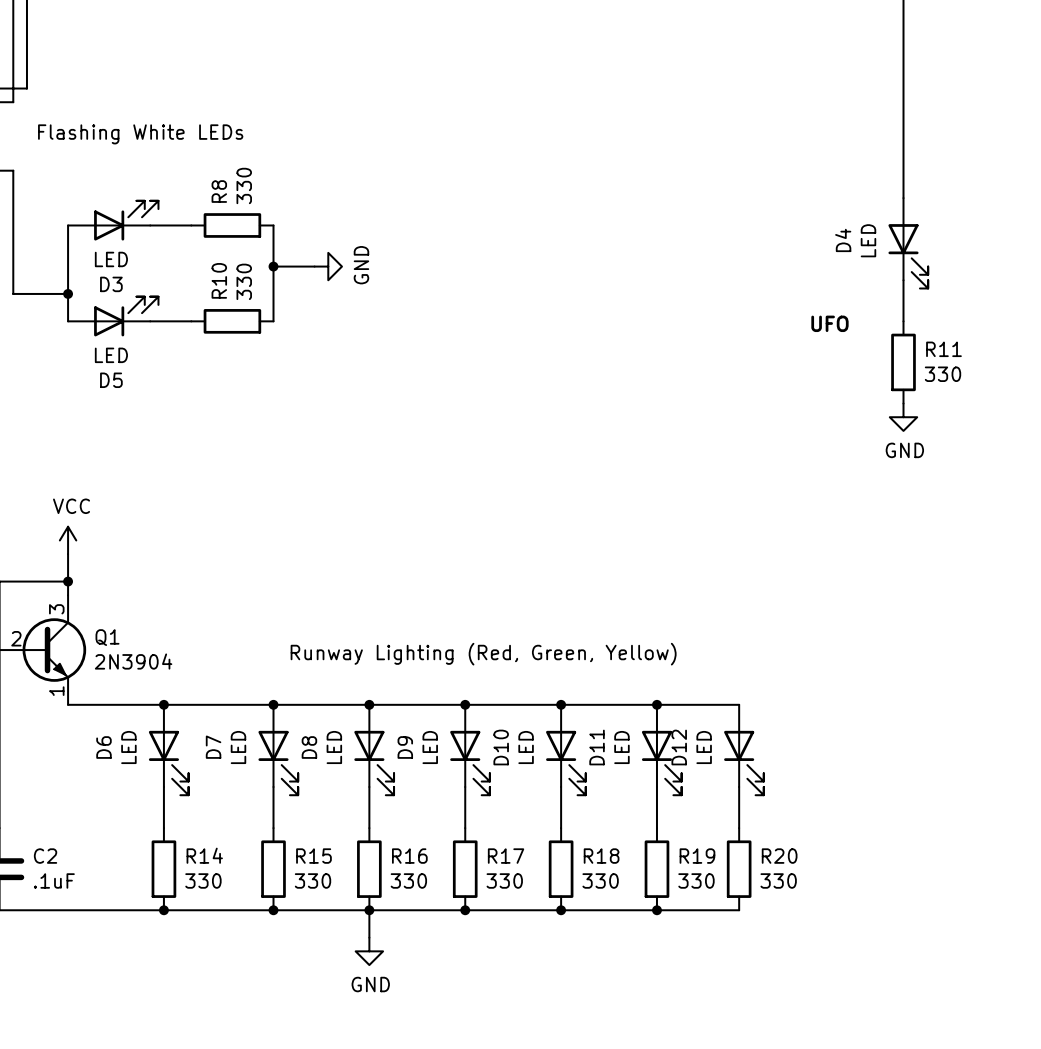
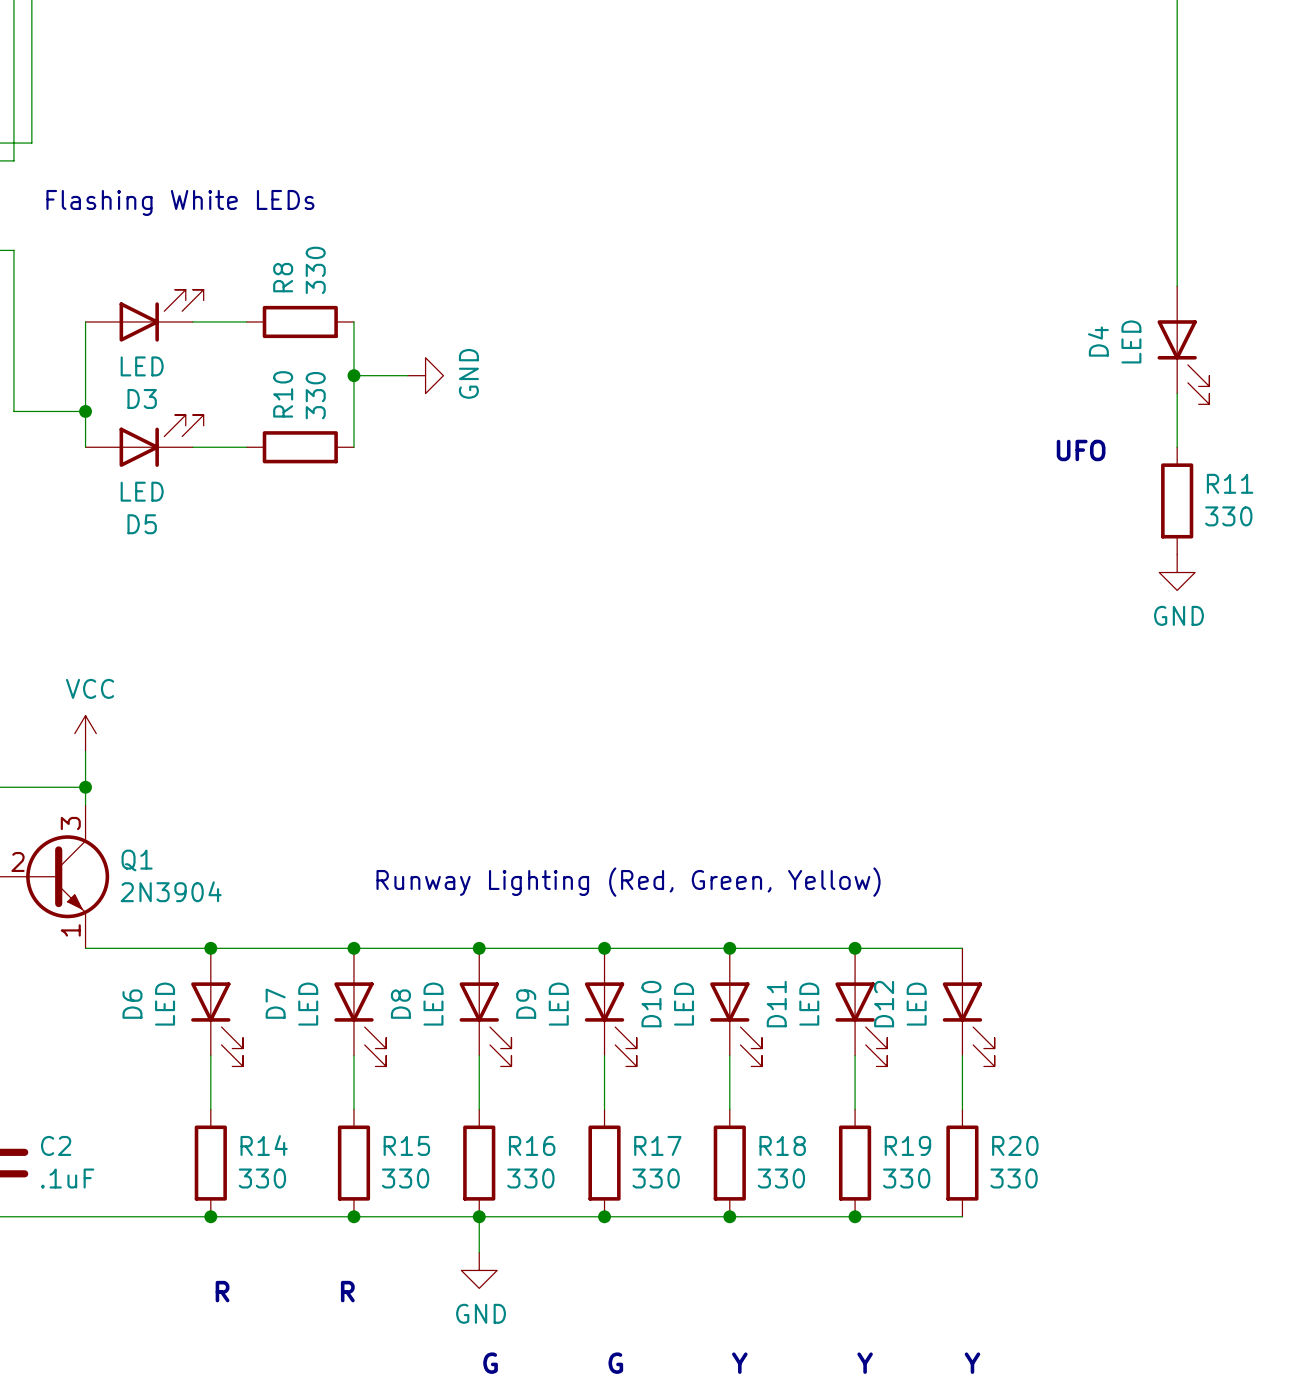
text: none -> R (222, 1291)
text: none -> R (347, 1291)
text: none -> G (490, 1363)
text: none -> G (615, 1363)
text: none -> Y (739, 1363)
text: none -> Y (865, 1363)
text: none -> Y (972, 1363)

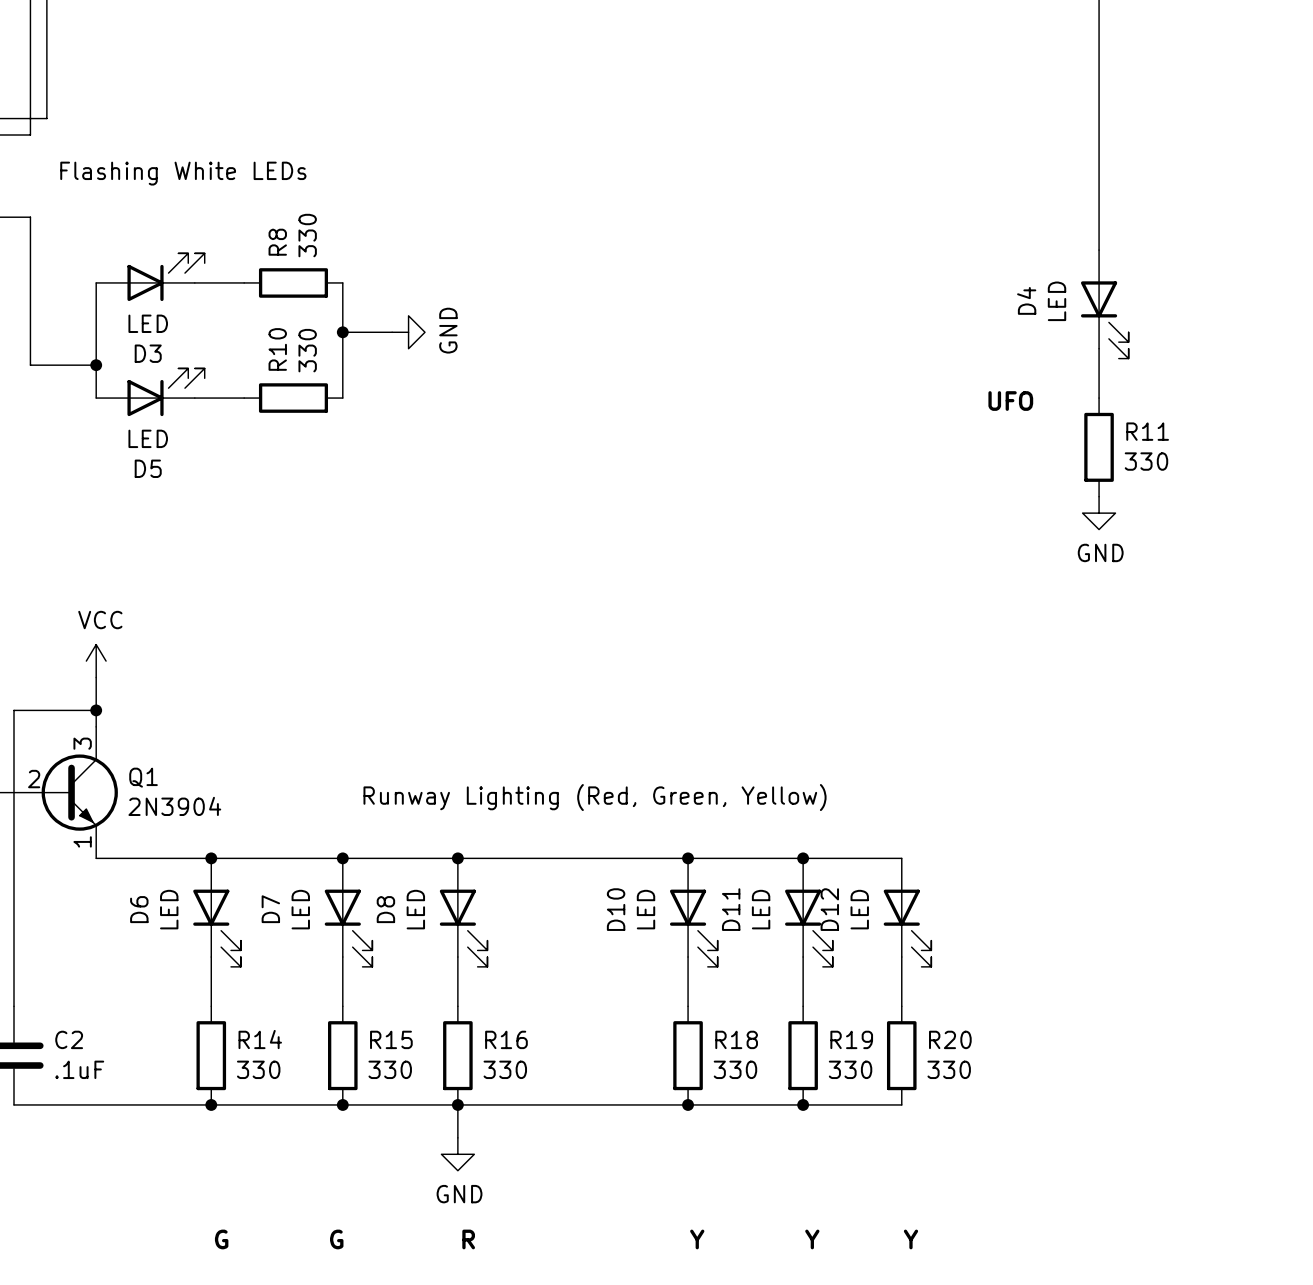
junction: (604, 948) -> none
D9: LED (610, 1007) -> none
wire: (604, 1055) (604, 1109) -> none
R17: 330 (604, 1163) -> none
junction: (604, 1216) -> none
text: R (222, 1291) -> none
text: R (347, 1291) -> none
text: none -> G (221, 1239)
text: none -> G (336, 1239)
text: G (490, 1363) -> R (468, 1239)
text: G (615, 1363) -> none

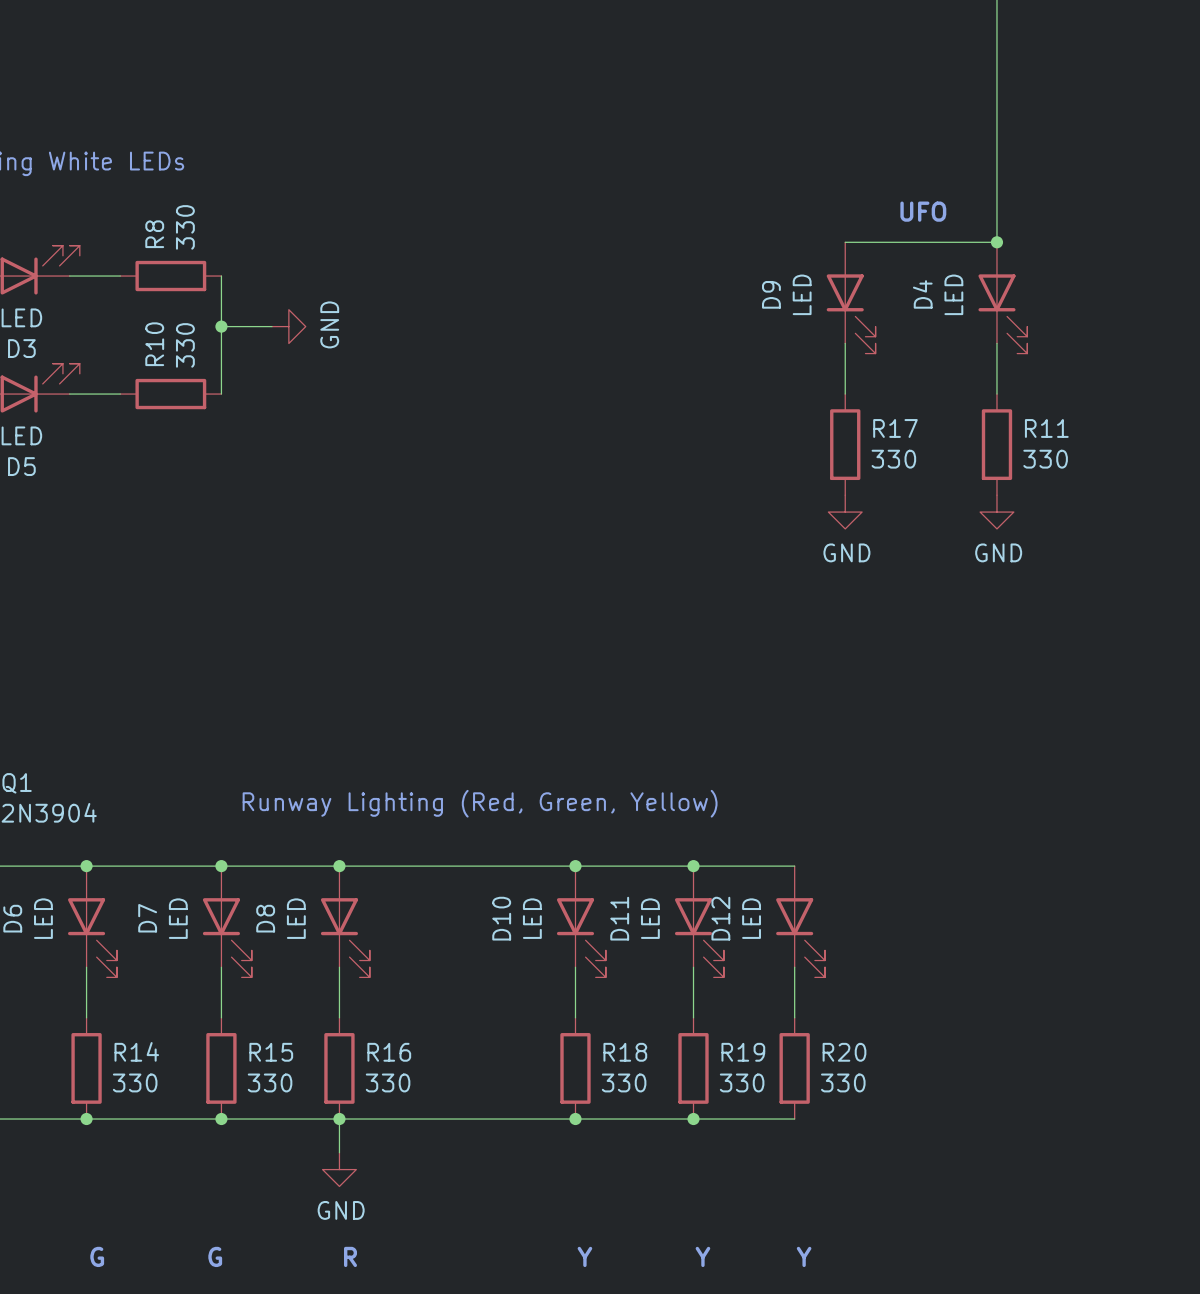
wire: none -> (845, 242) (996, 242)
junction: none -> (996, 242)
D9: none -> LED (851, 297)
wire: none -> (845, 343) (845, 394)
text position: UFO (1010, 401) -> UFO (923, 211)
R17: none -> 330 (845, 444)
power symbol: none -> GND (845, 512)

